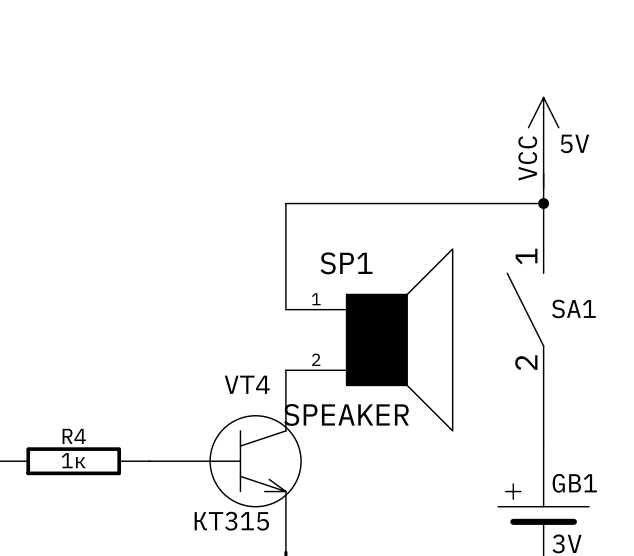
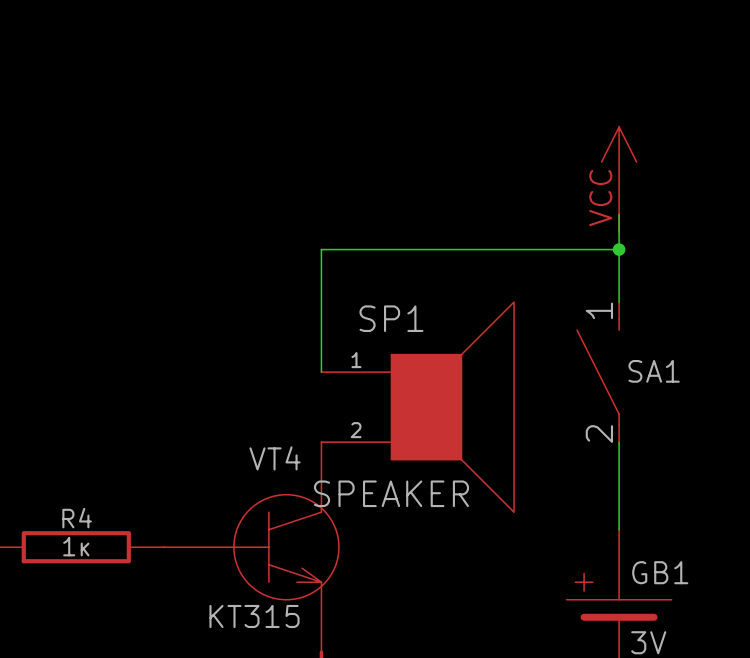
text: 5V (574, 143) -> none

